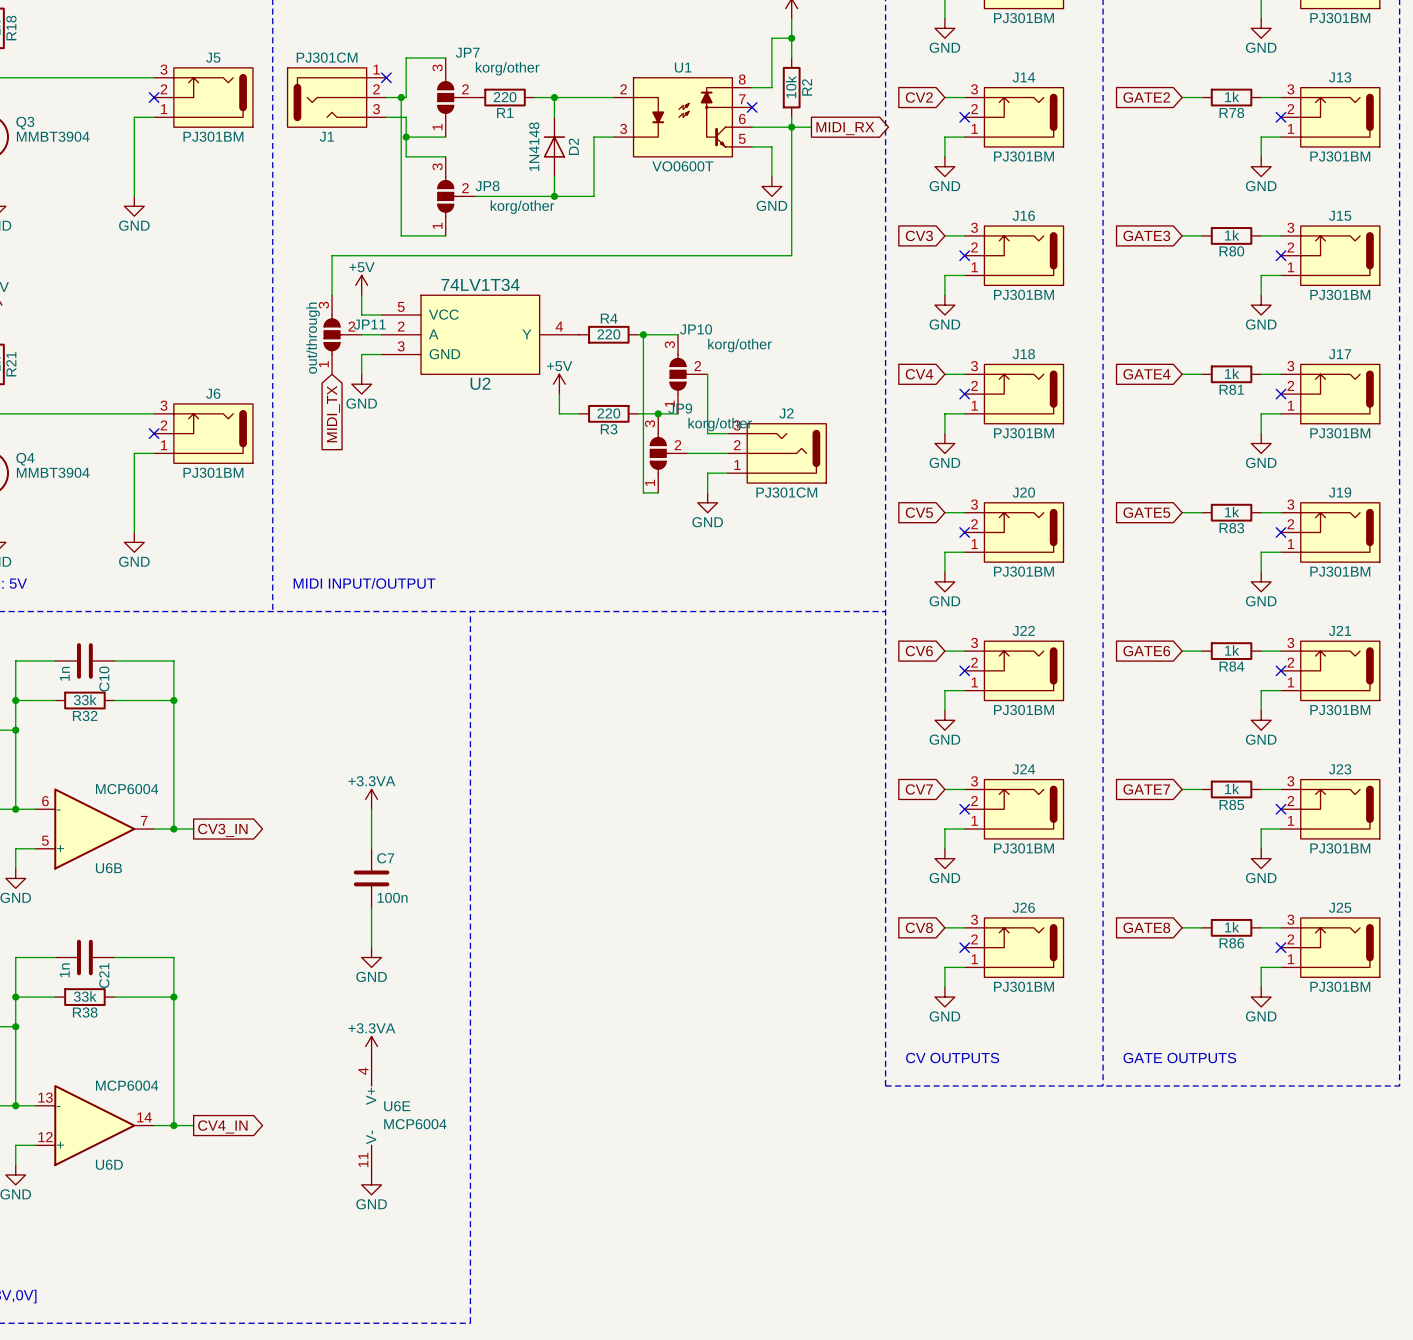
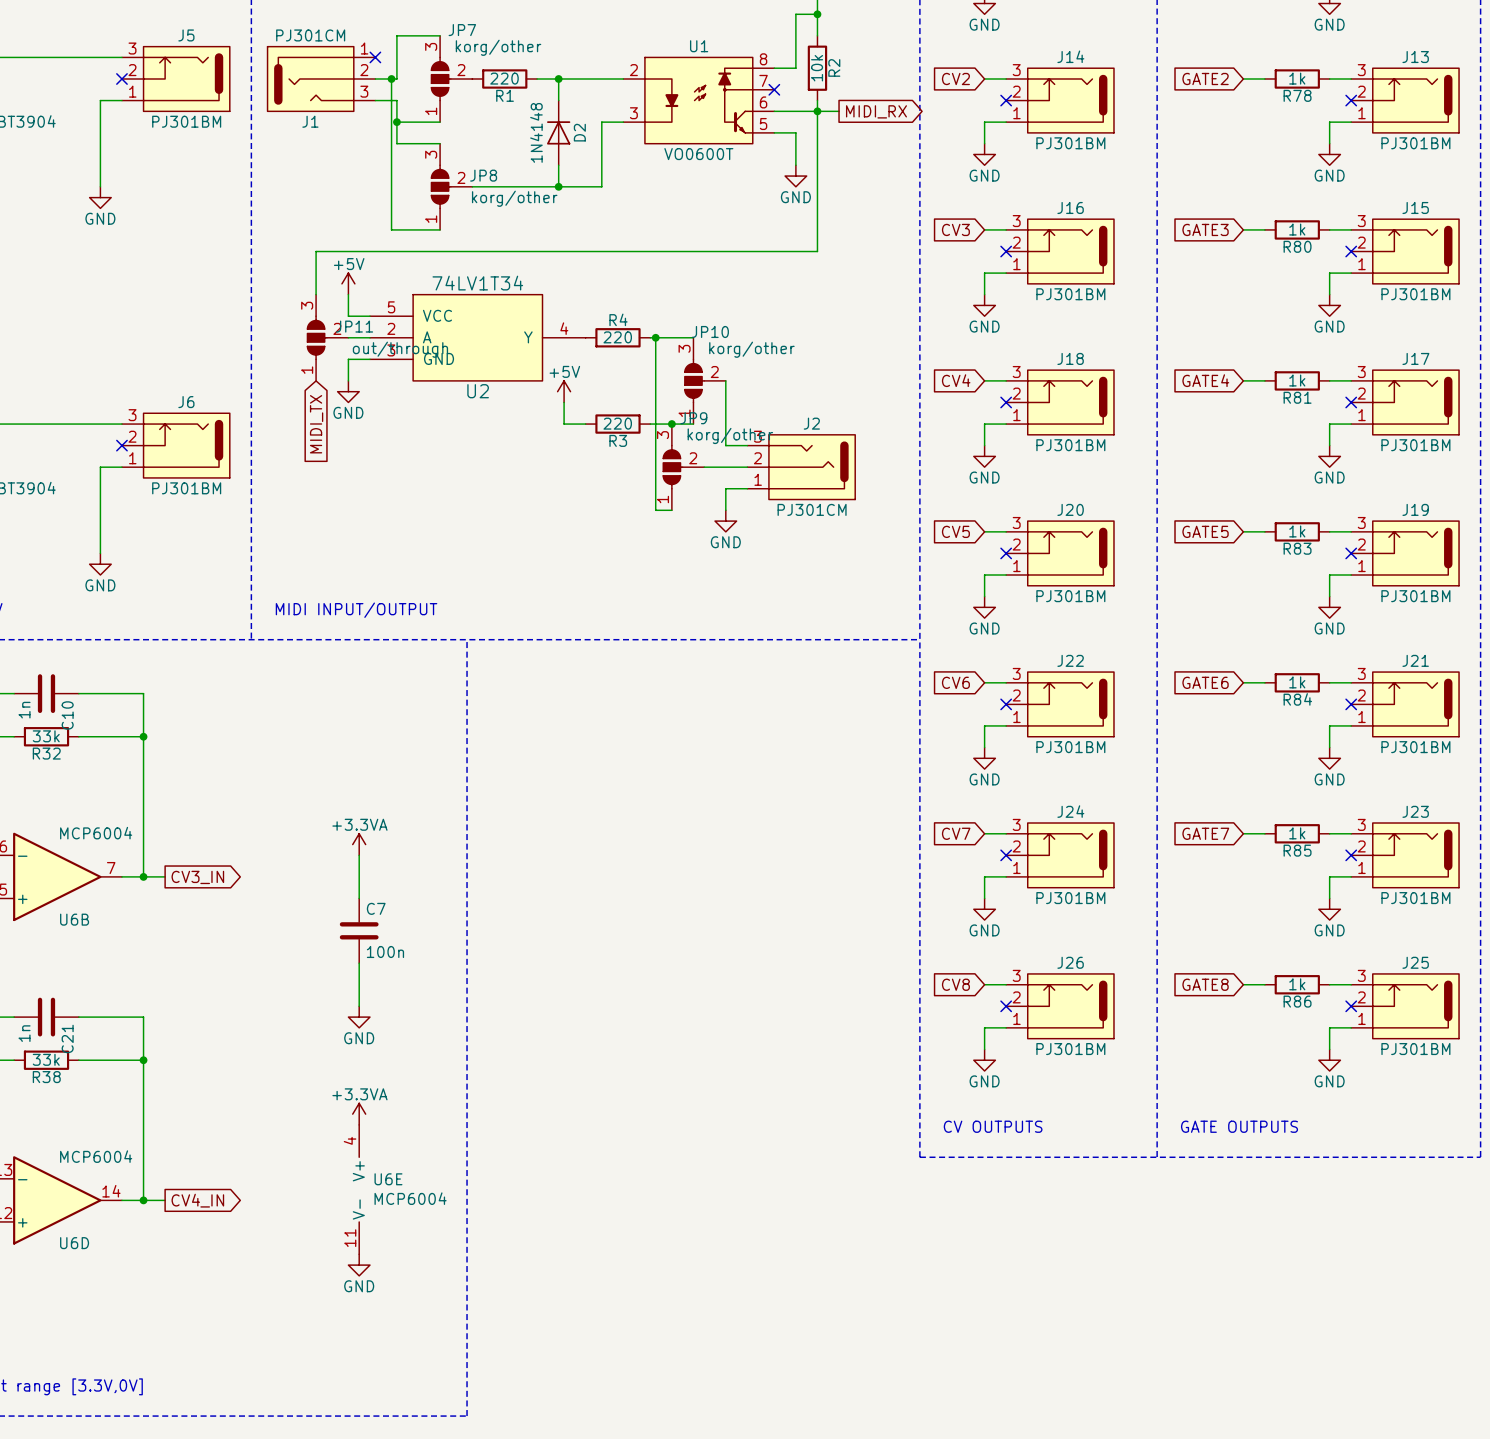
JP11 value rotation: 0° (313, 338) -> 90° clockwise (400, 349)

